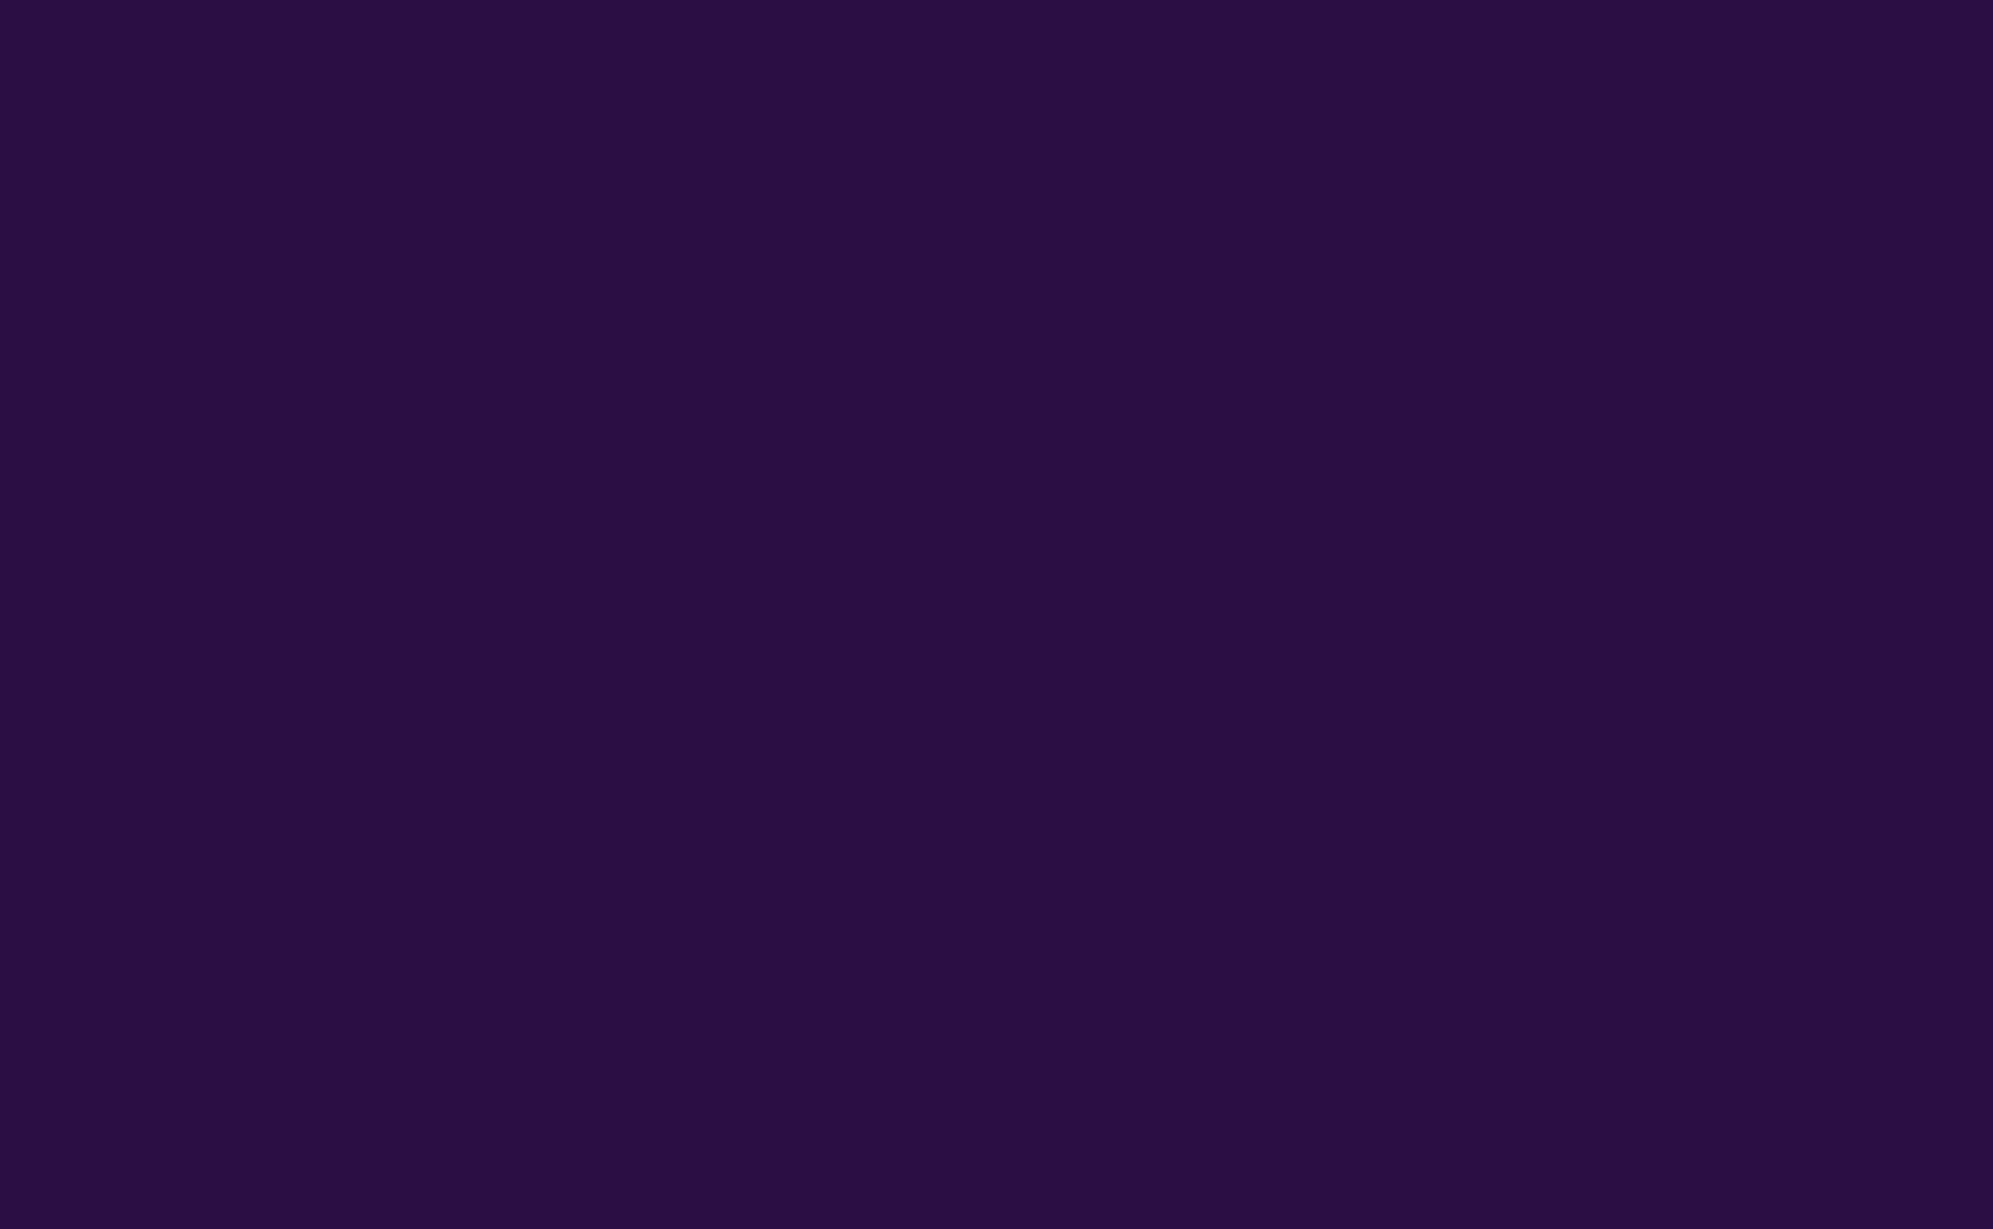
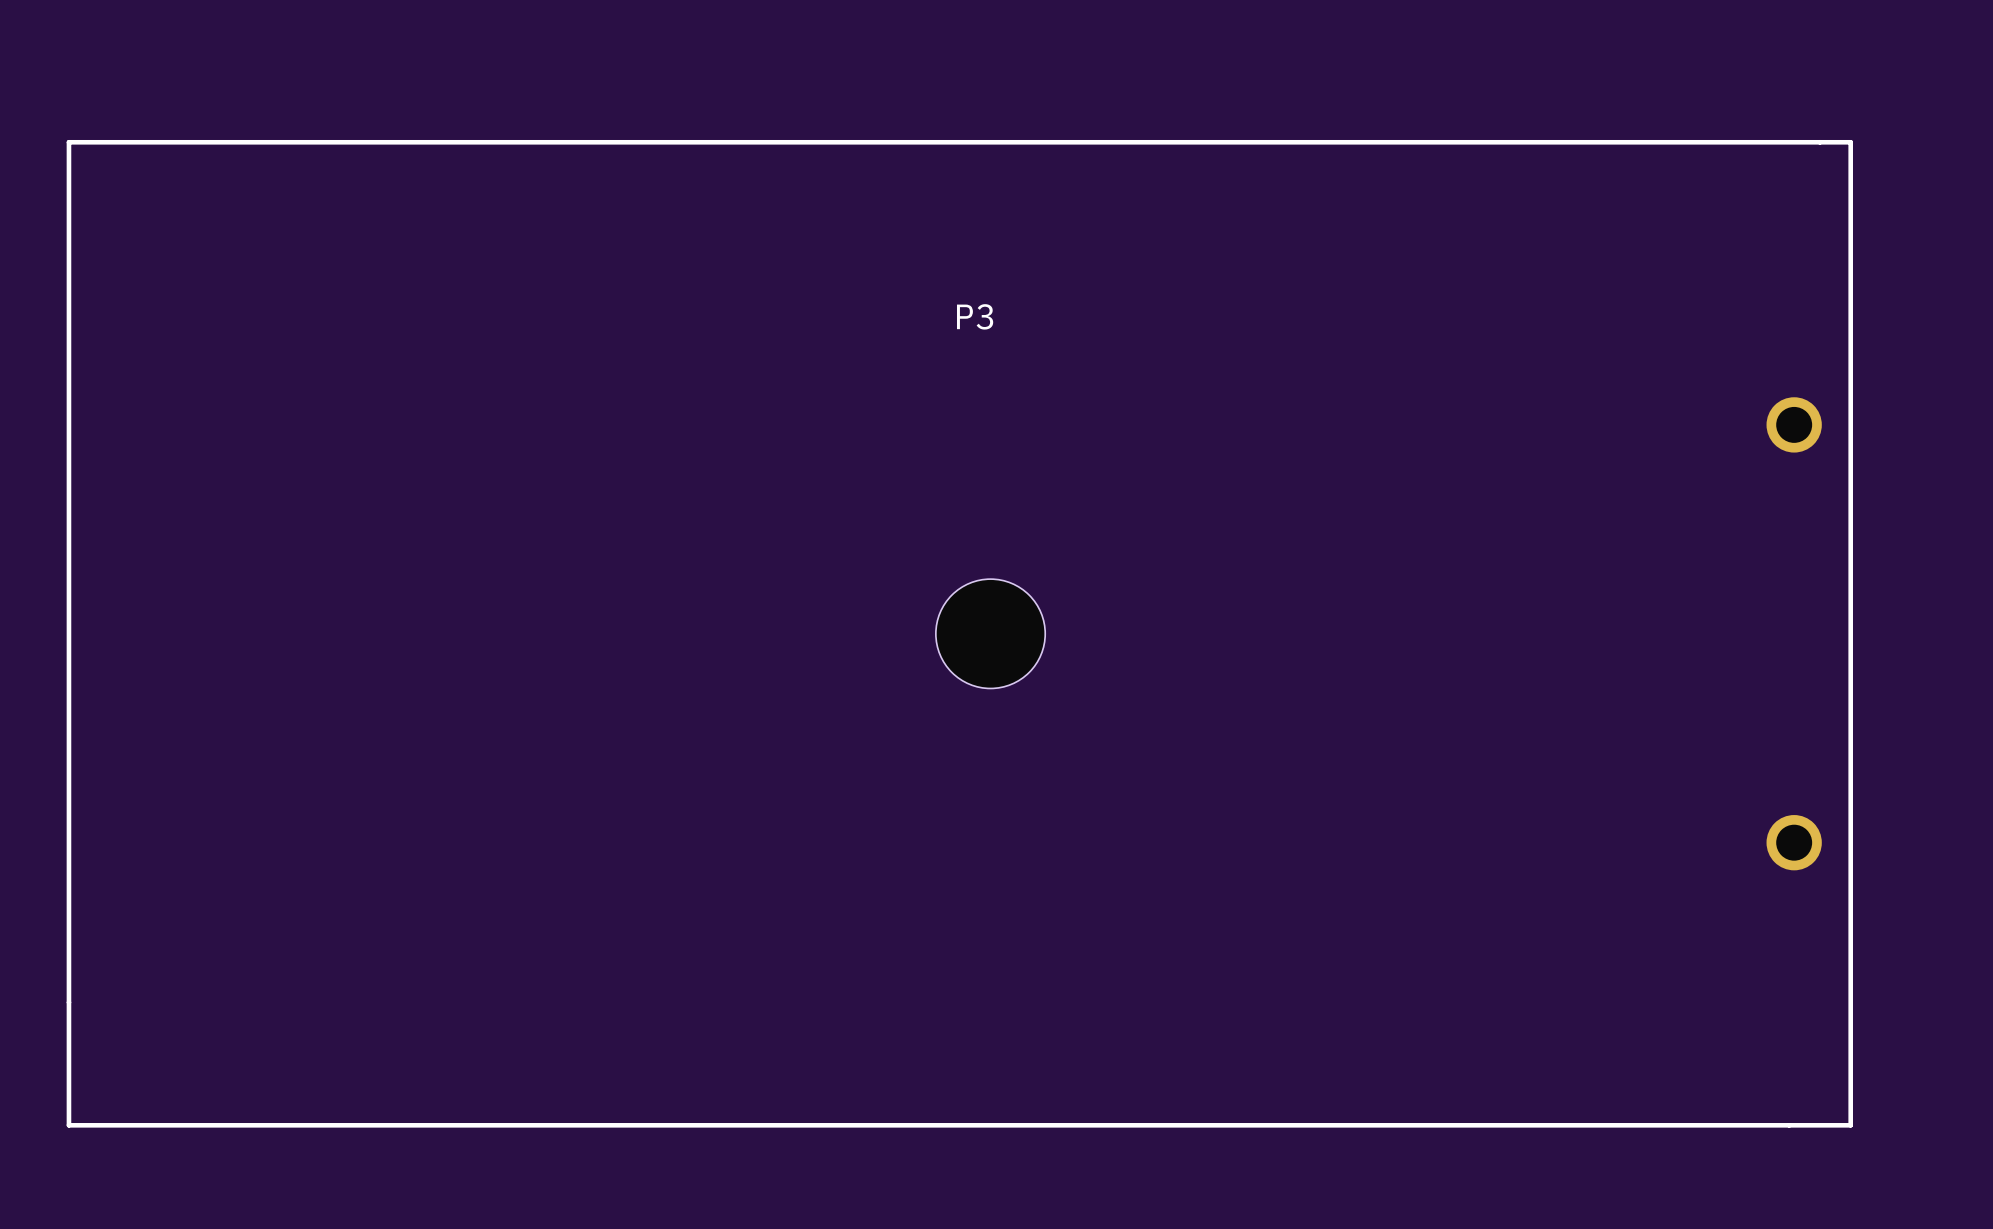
P3: none -> (959, 633)

